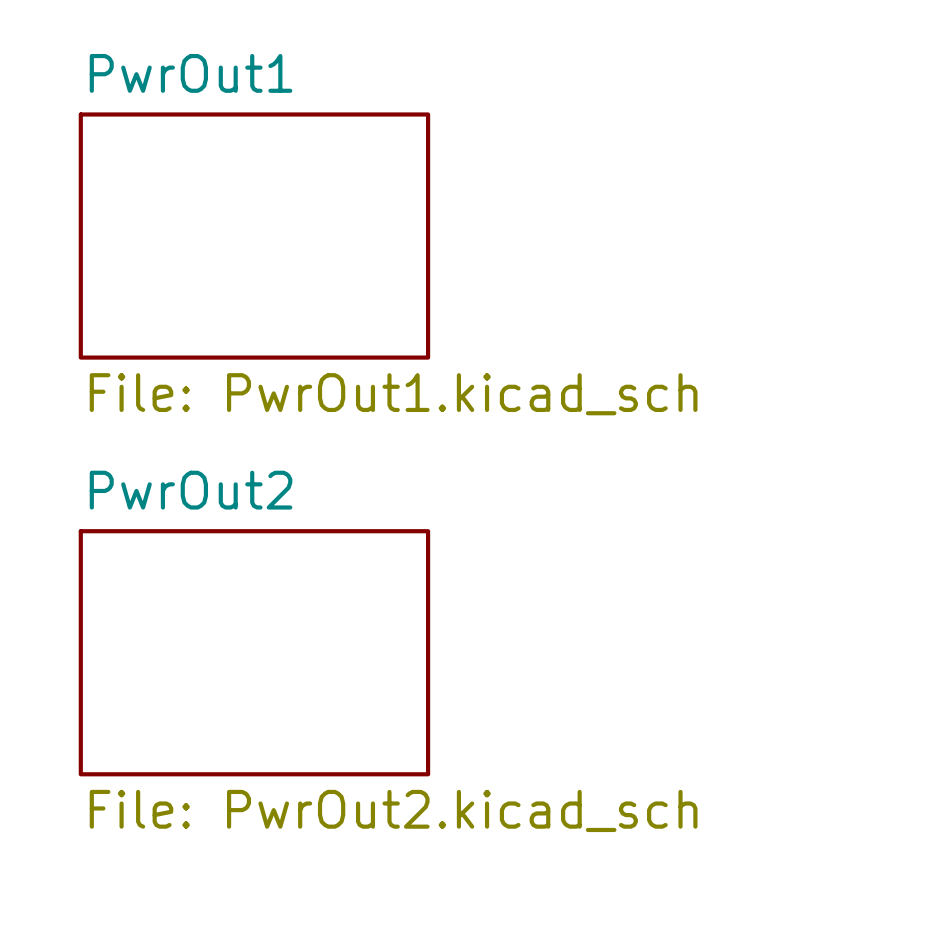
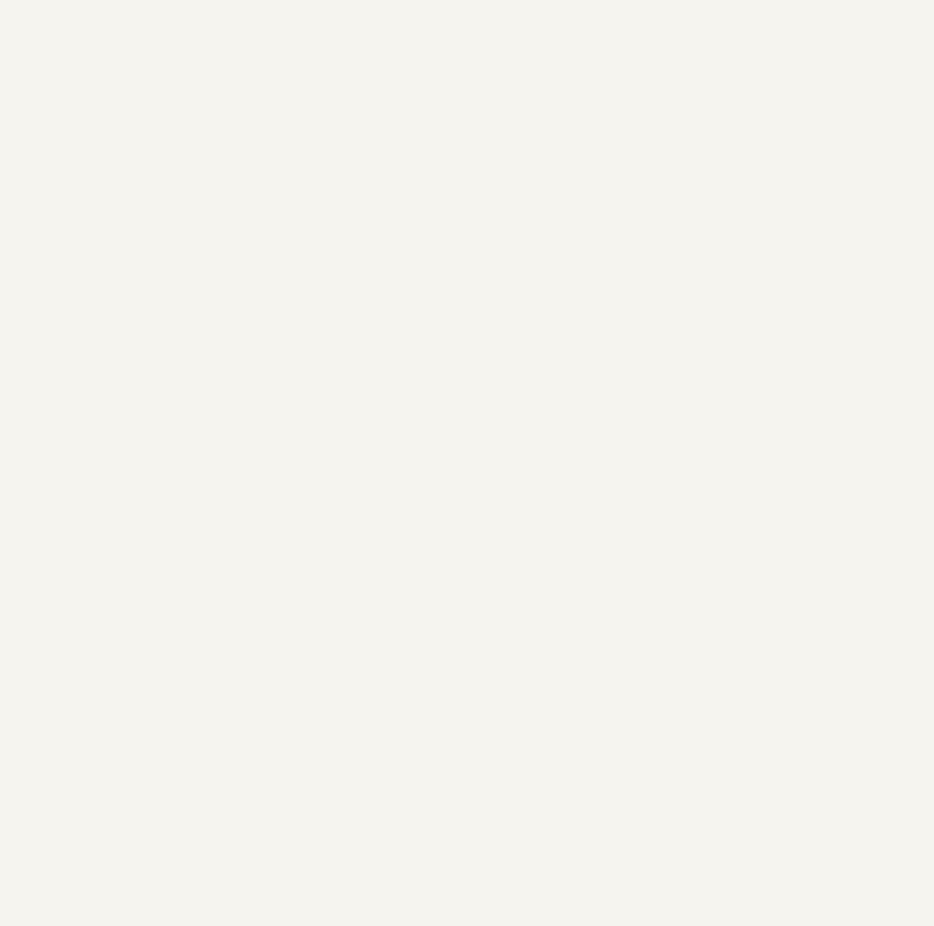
sheet PwrOut1: File: PwrOut1.kicad_sch (254, 236) -> none
sheet PwrOut2: File: PwrOut2.kicad_sch (254, 652) -> none

